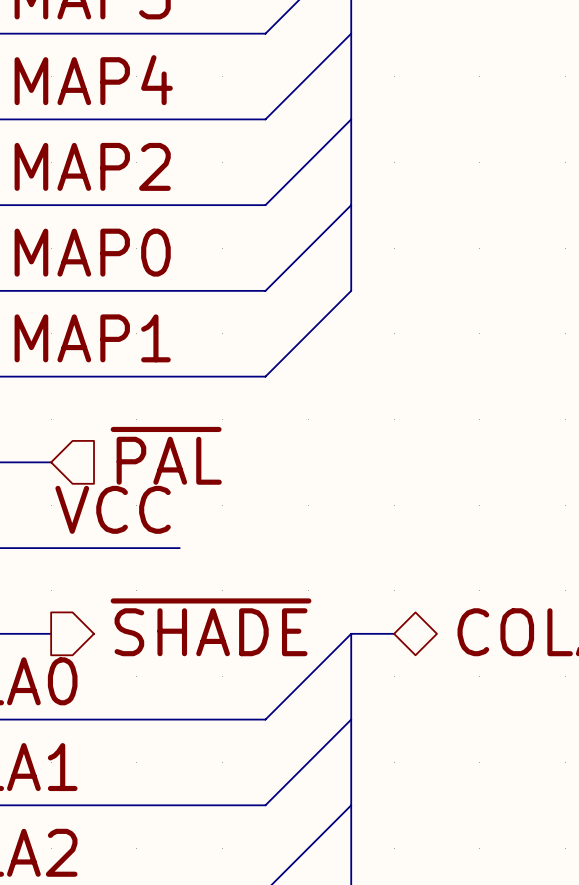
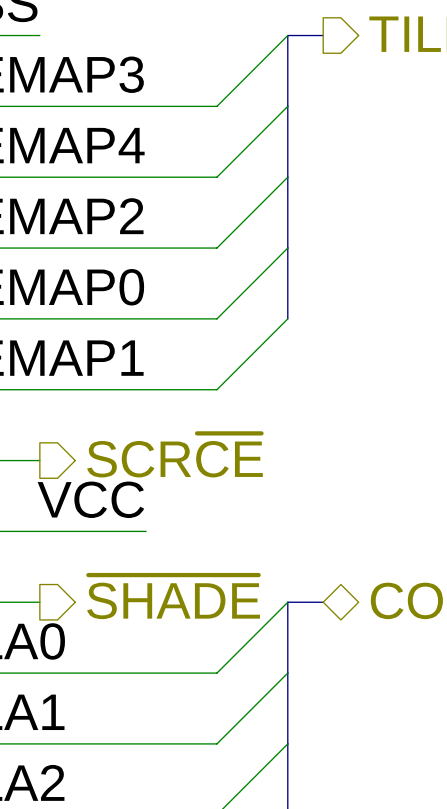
hierarchical label shape: input (166, 455) -> output (175, 455)
hierarchical label: ~{PAL} (166, 455) -> SCR~{CE} (175, 455)

